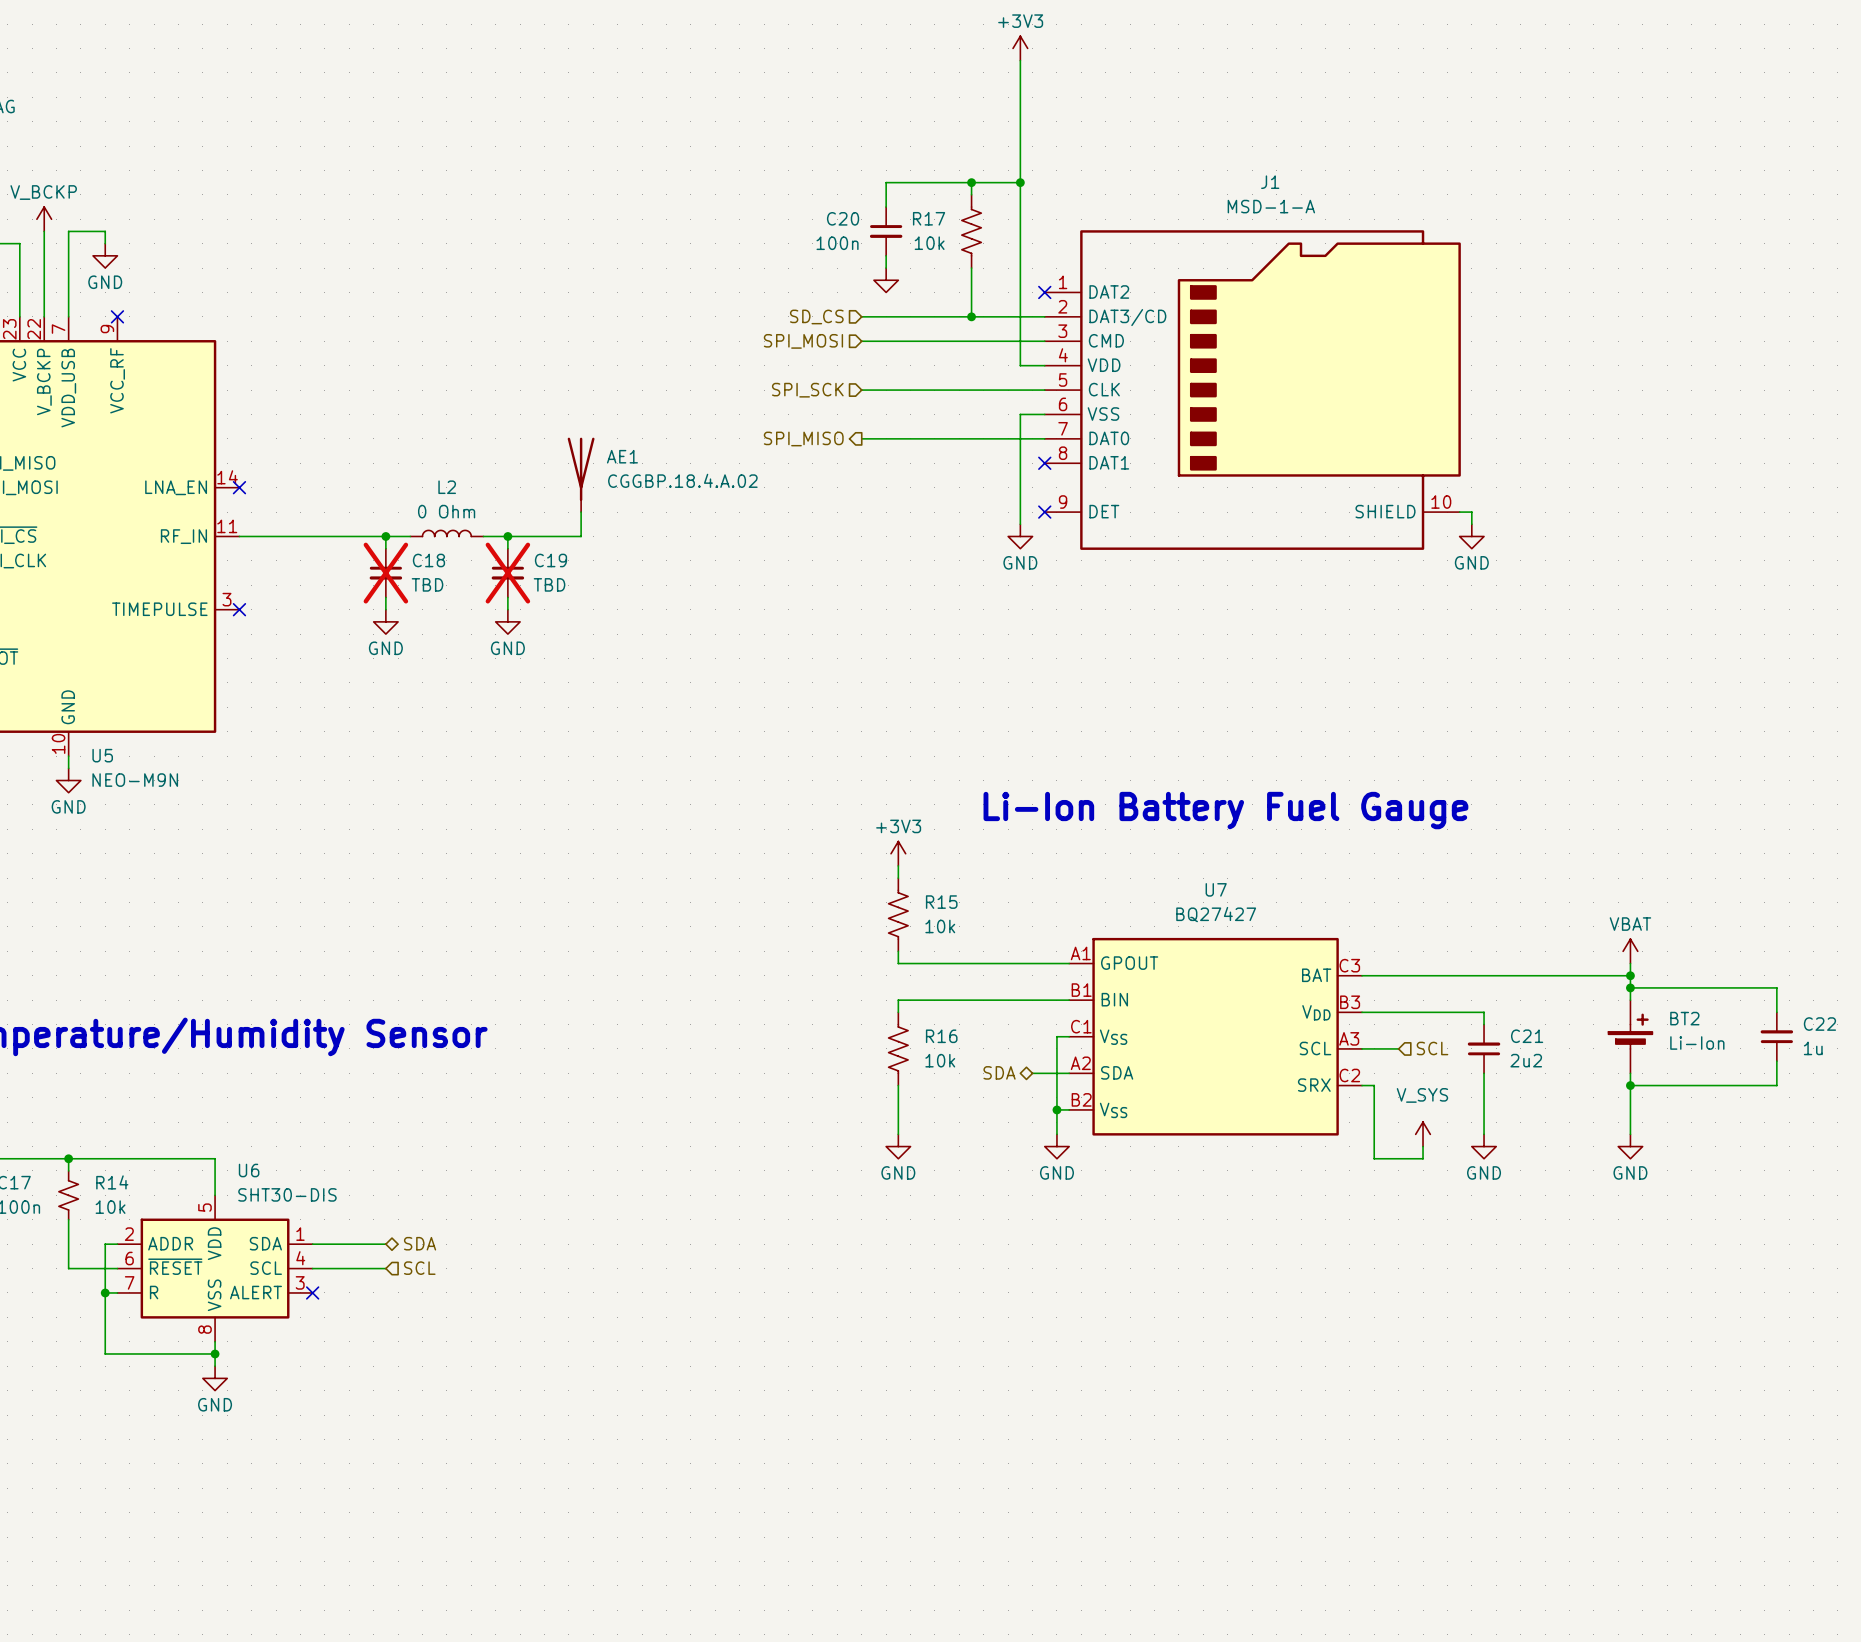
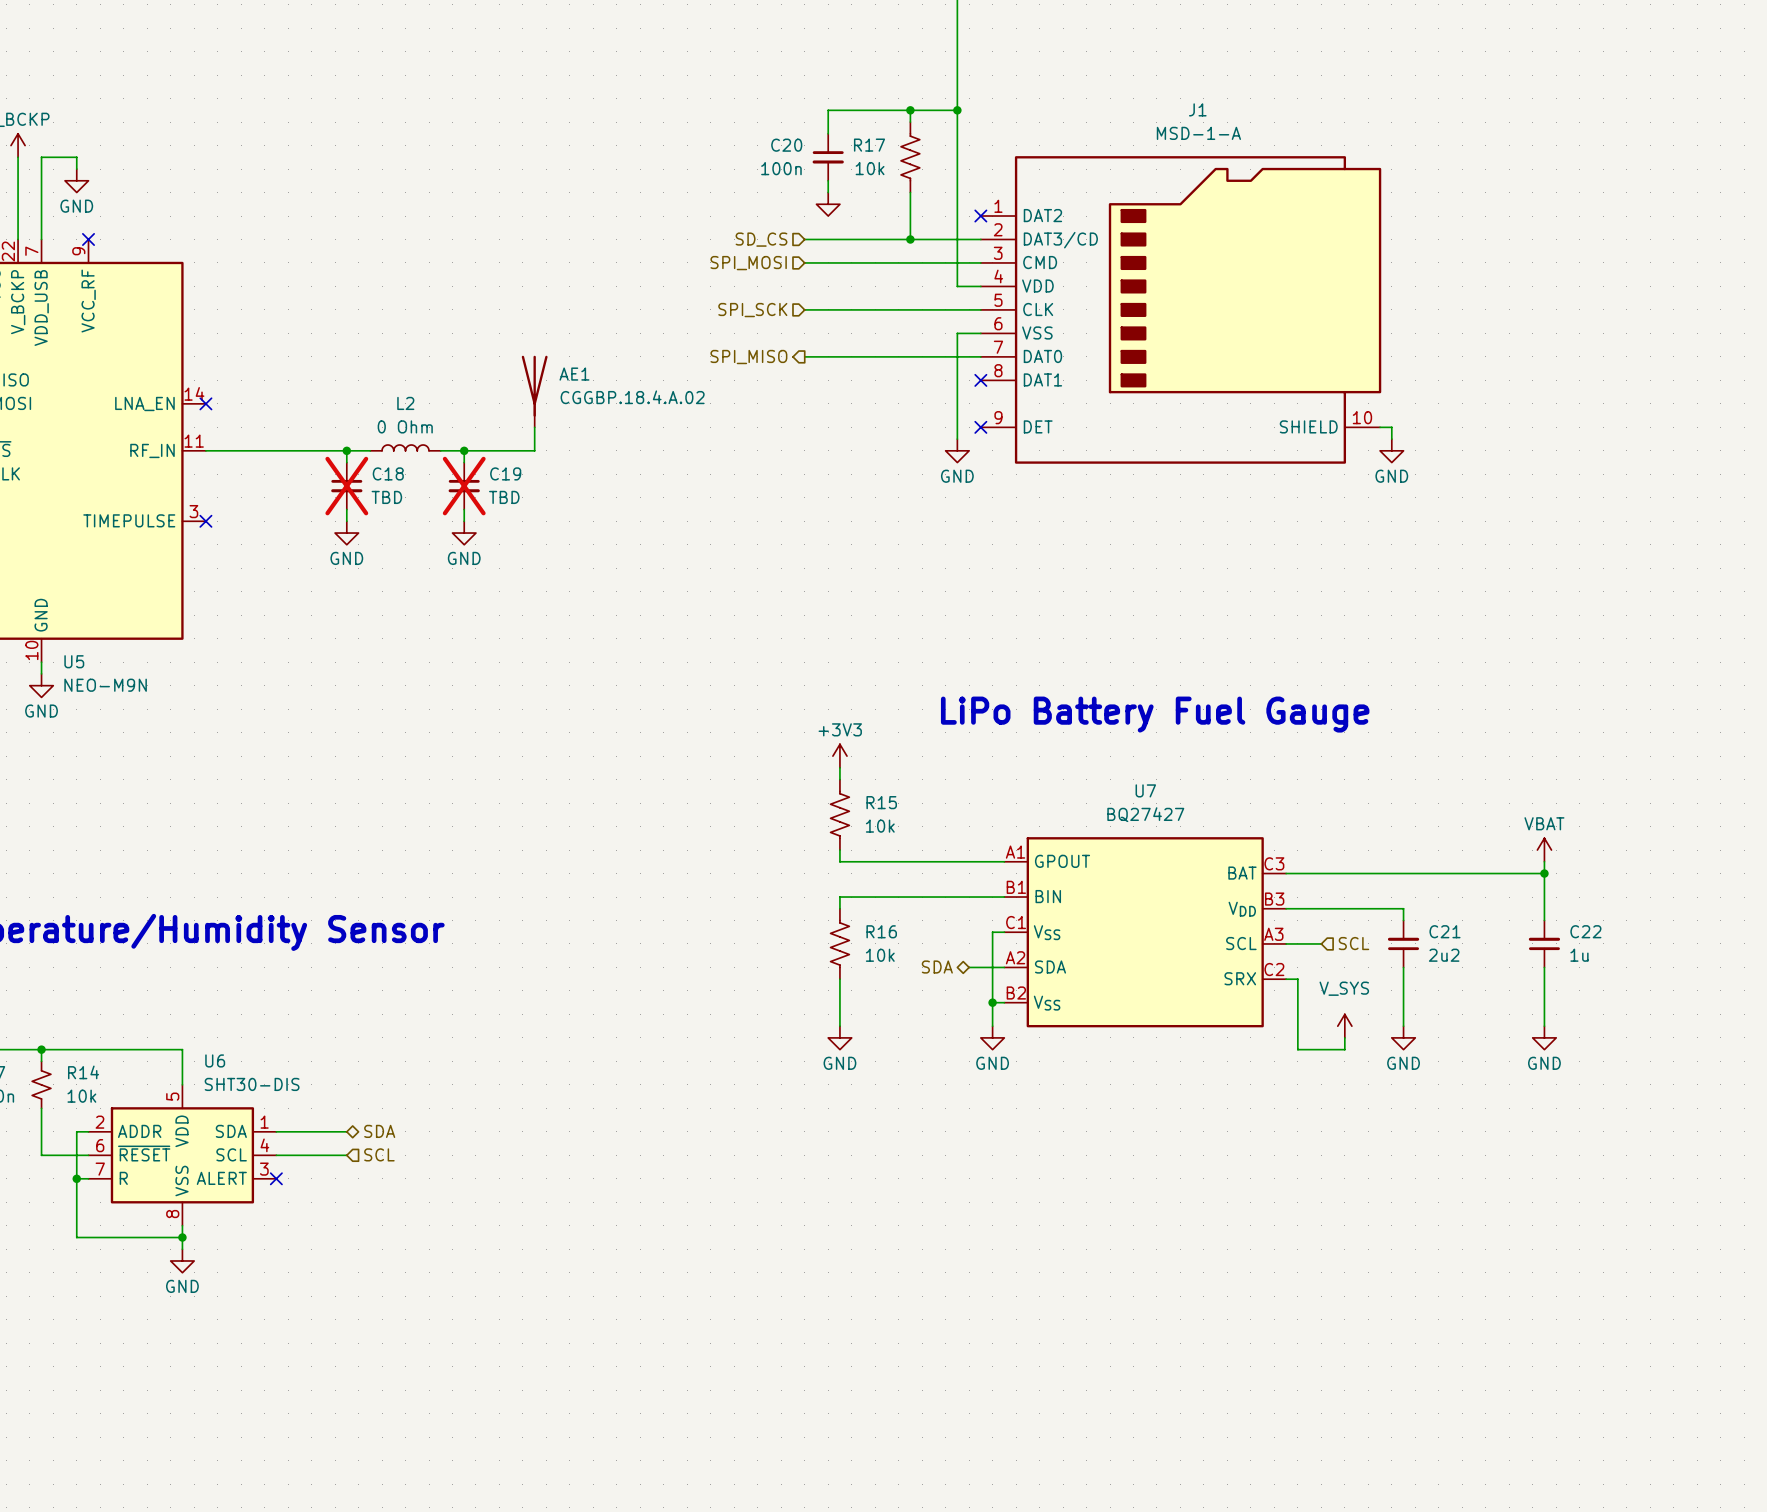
text: Li-Ion Battery Fuel Gauge (1225, 810) -> LiPo Battery Fuel Gauge (1155, 714)
wire: (1630, 987) (1776, 987) (1776, 1012) -> none
junction: (1630, 987) -> none
BT2: Li-Ion (1630, 1036) -> none
C22 position: (1776, 1036) -> (1544, 943)
wire: (1776, 1061) (1776, 1085) (1630, 1085) -> none
junction: (1630, 1085) -> none

